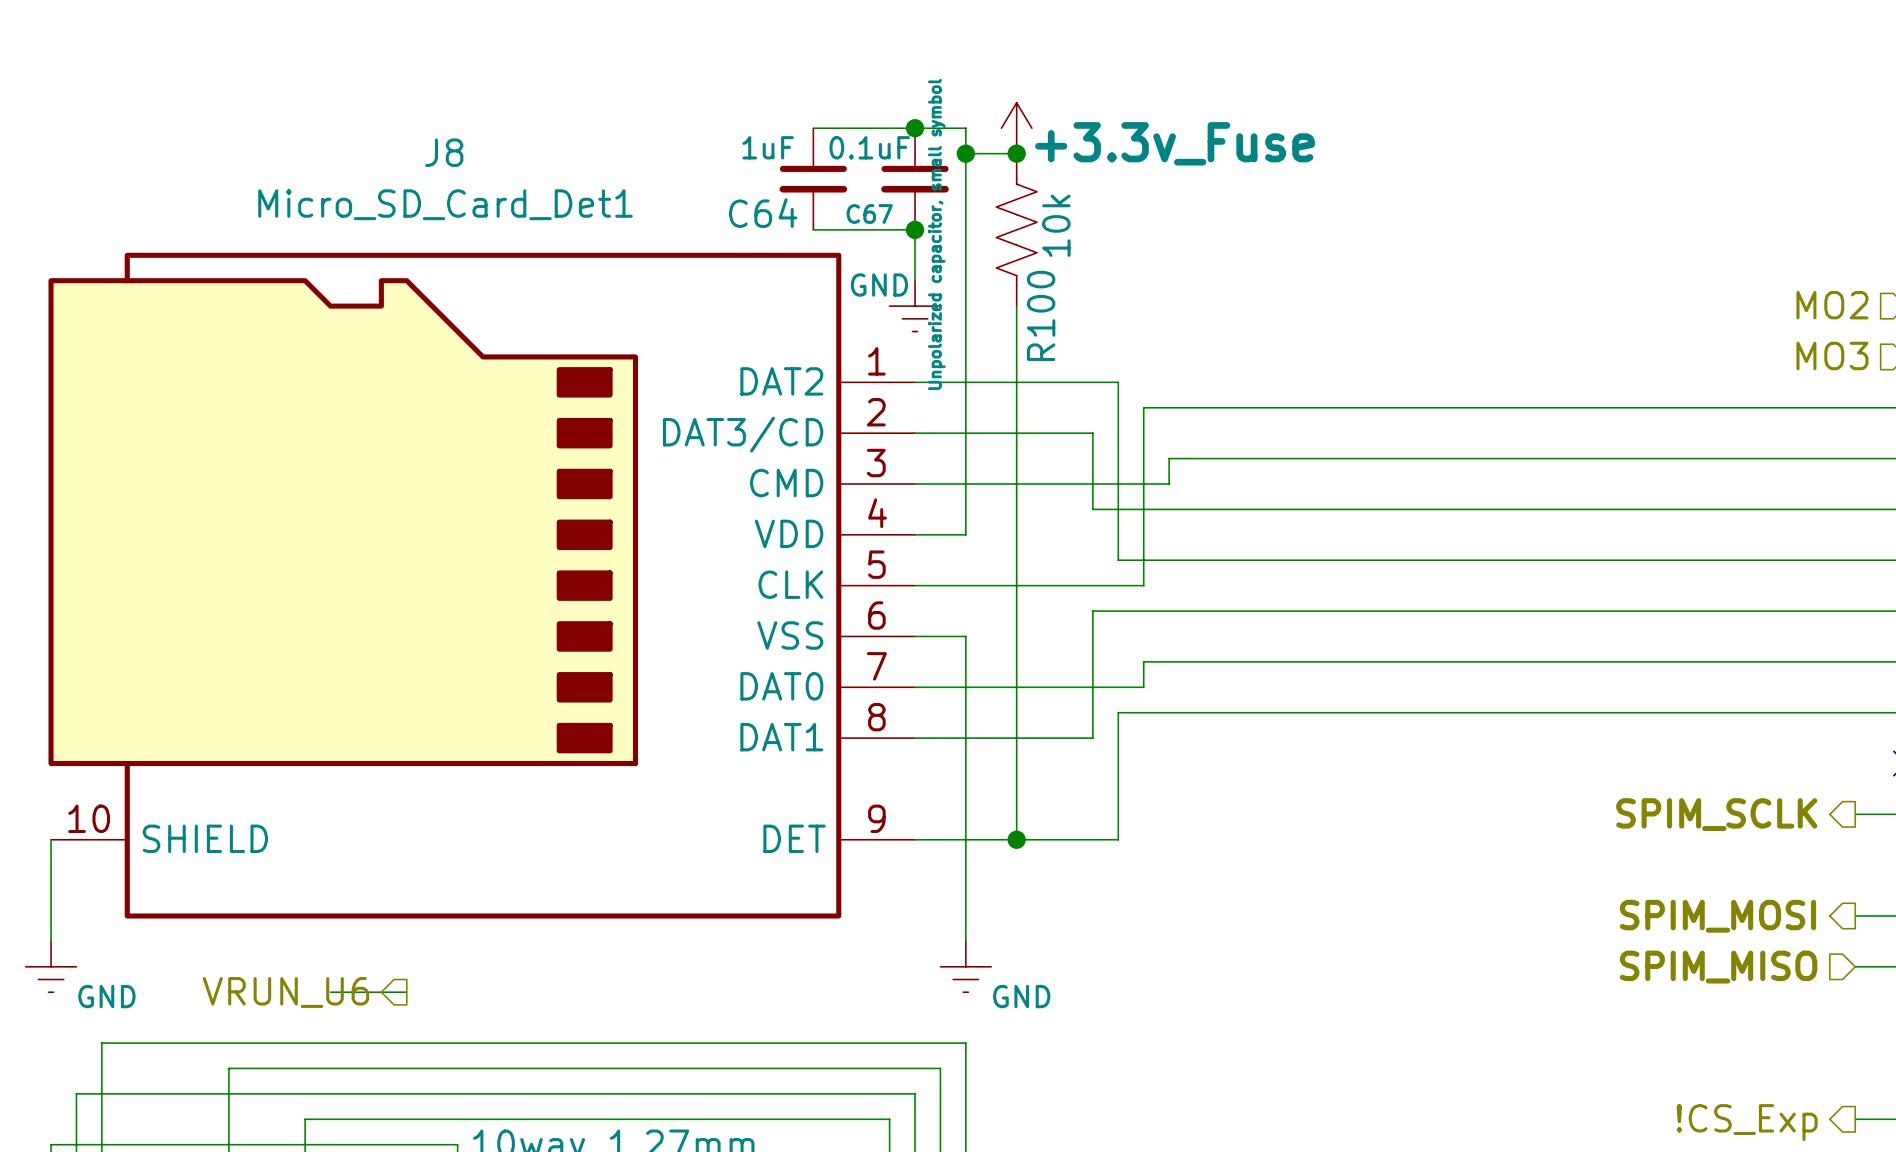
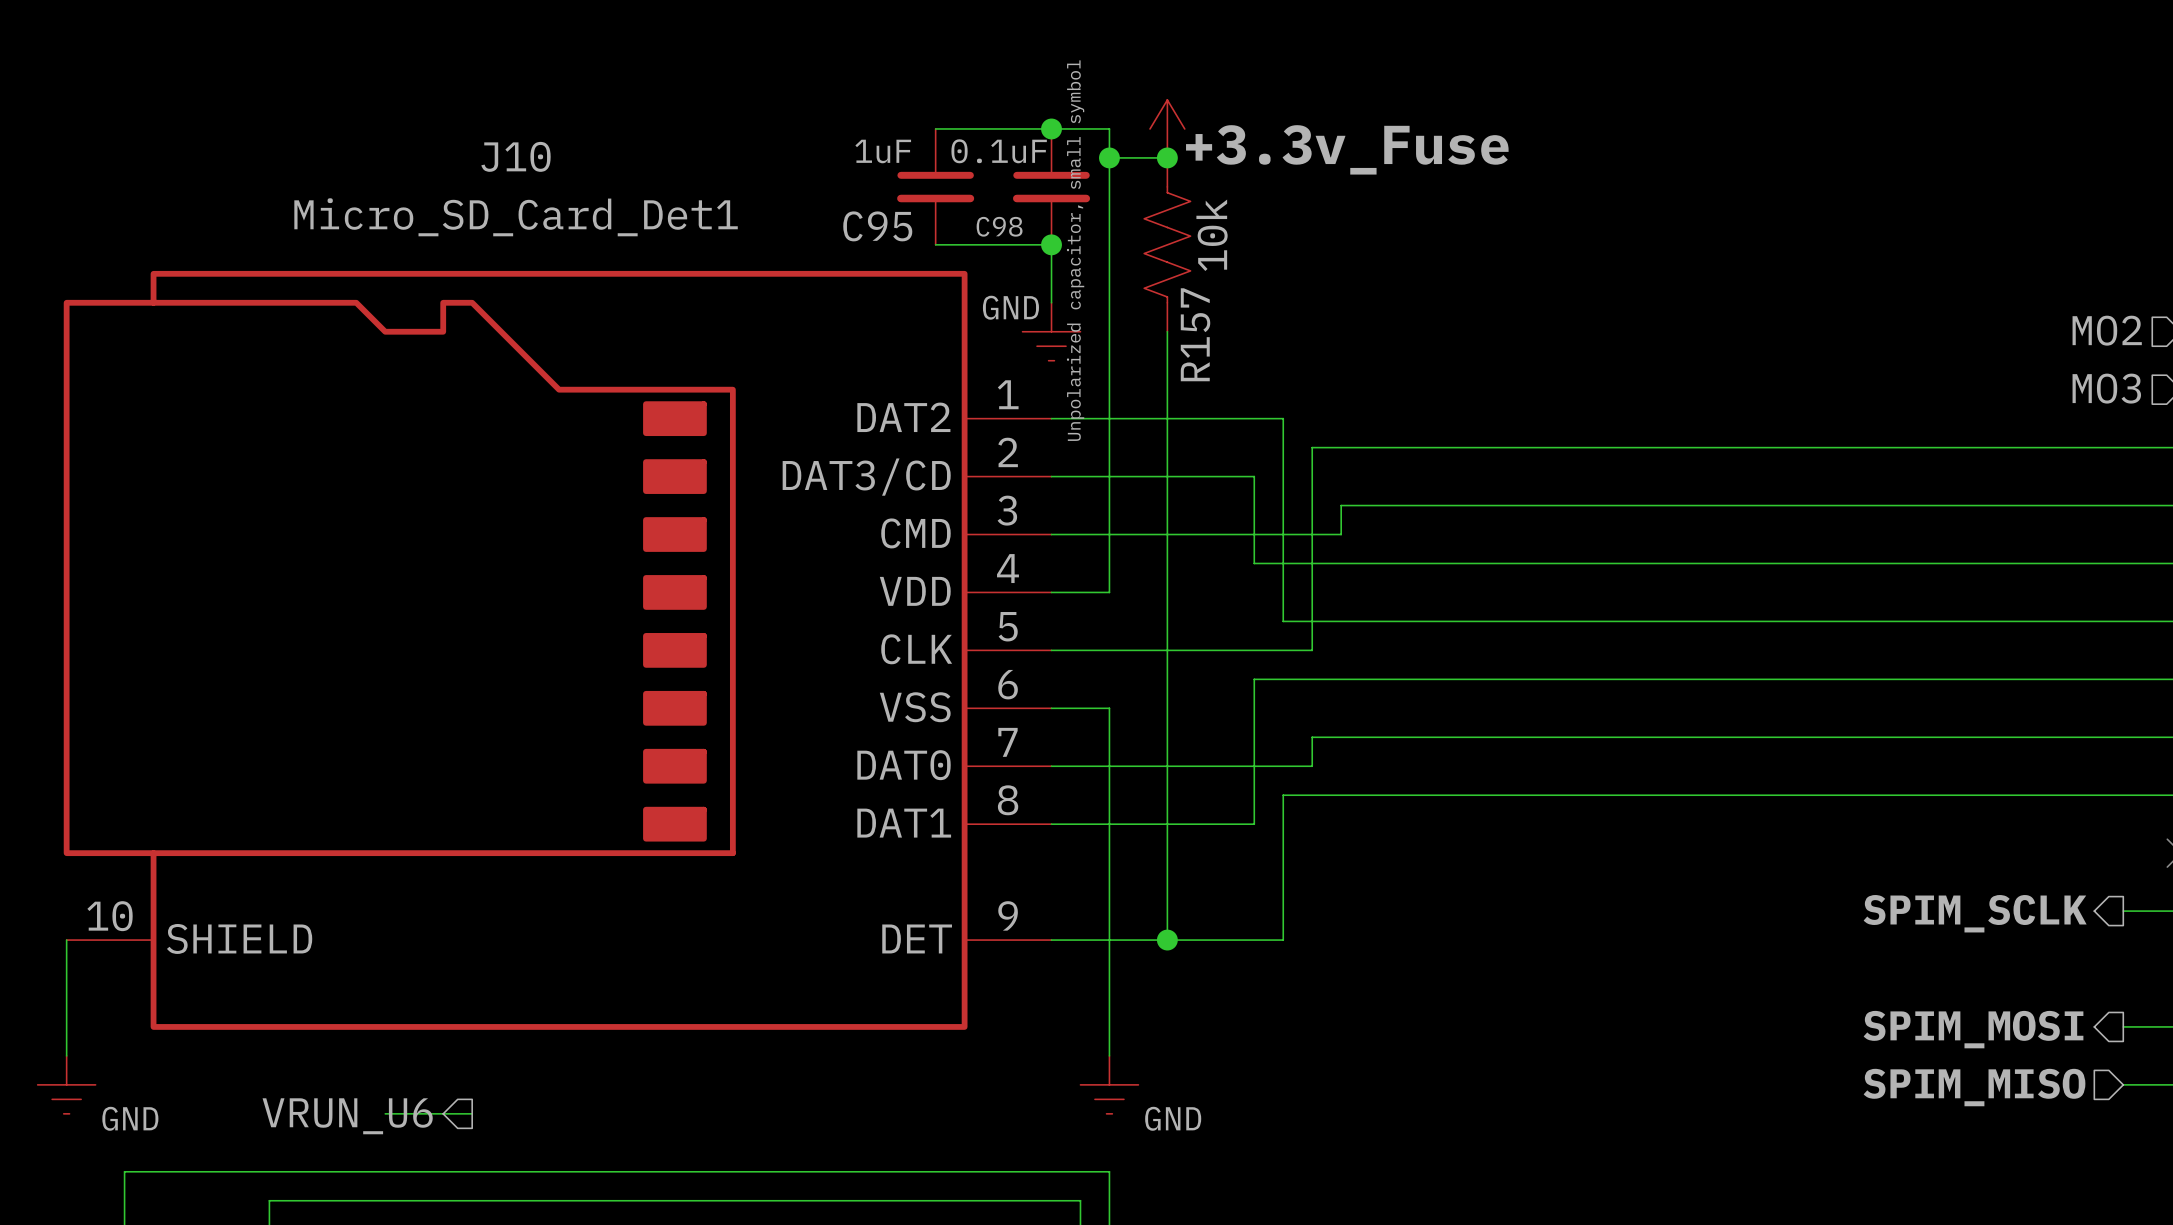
J8 name: J8 (444, 152) -> J10 (516, 156)
C64 name: C64 (763, 213) -> C95 (877, 226)
C67 name: C67 (869, 214) -> C98 (999, 226)
R100 name: R100 (1041, 315) -> R157 (1195, 334)

